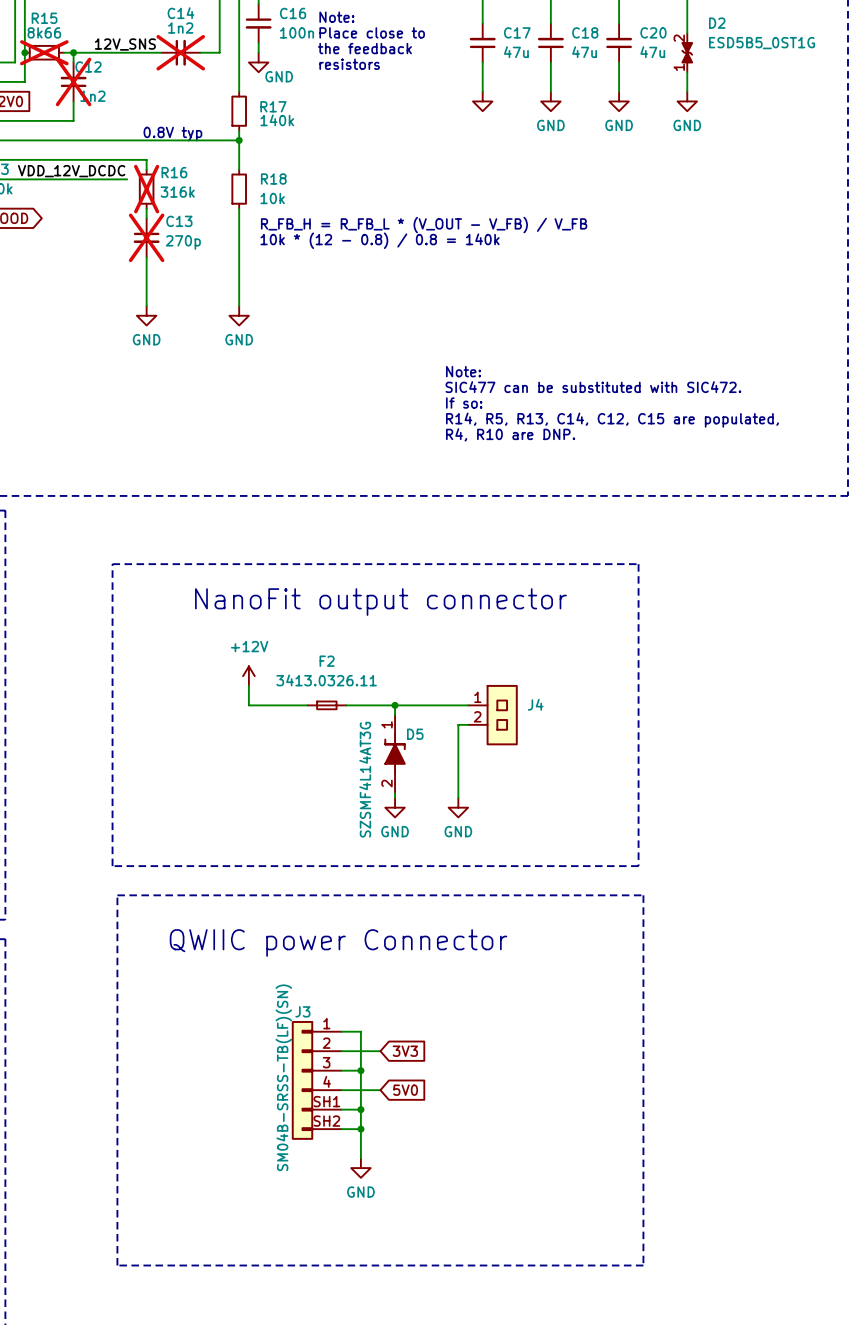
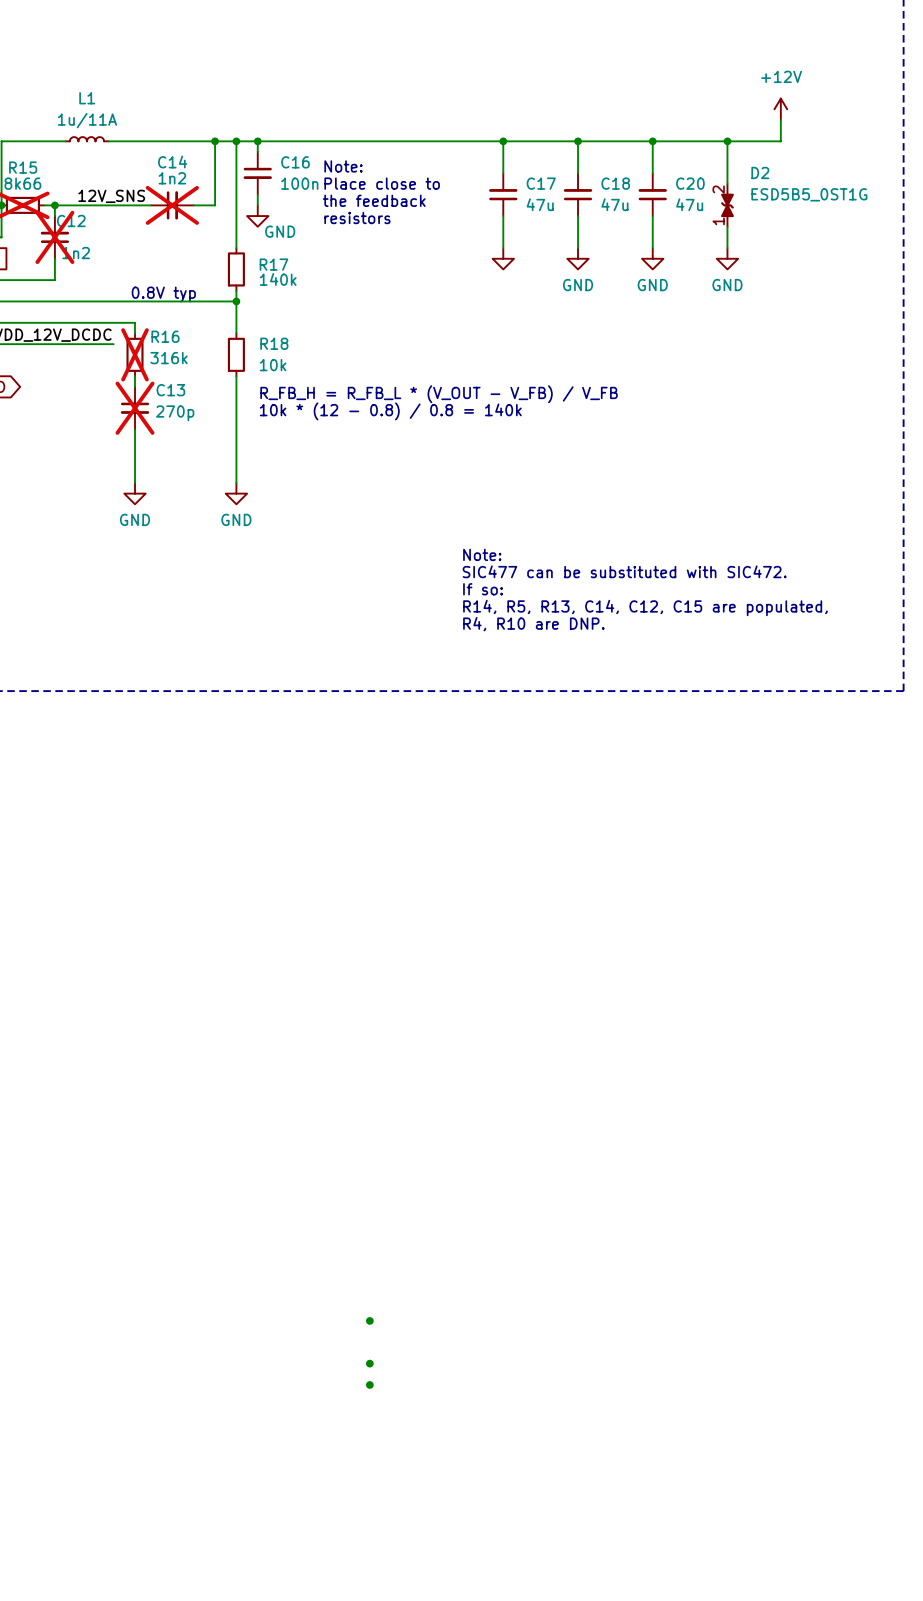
line: (112, 564) (638, 564) (638, 866) (112, 866) (112, 564) -> none
text: NanoFit output connector (380, 602) -> none
power symbol: +12V (248, 676) -> none
wire: (248, 685) (248, 705) (307, 705) -> none
F2: (326, 705) -> none
wire: (346, 705) (468, 705) -> none
wire: (395, 705) (395, 715) -> none
junction: (395, 705) -> none
J4: (492, 715) -> none
wire: (468, 724) (458, 724) (458, 797) -> none
D5: (395, 754) -> none
wire: (395, 793) (395, 797) -> none
power symbol: GND (395, 807) -> none
power symbol: GND (458, 807) -> none
line: (117, 895) (643, 895) (643, 1265) (117, 1265) (117, 895) -> none
text: QWIIC power Connector (338, 942) -> none
wire: (341, 1031) (360, 1031) (360, 1158) -> none
wire: (341, 1051) (380, 1051) -> none
global label: 3V3 (405, 1051) -> none
wire: (341, 1070) (360, 1070) -> none
J3: (316, 1080) -> none
wire: (341, 1090) (380, 1090) -> none
global label: 5V0 (405, 1090) -> none
wire: (341, 1109) (360, 1109) -> none
wire: (341, 1129) (360, 1129) -> none
power symbol: GND (360, 1168) -> none

